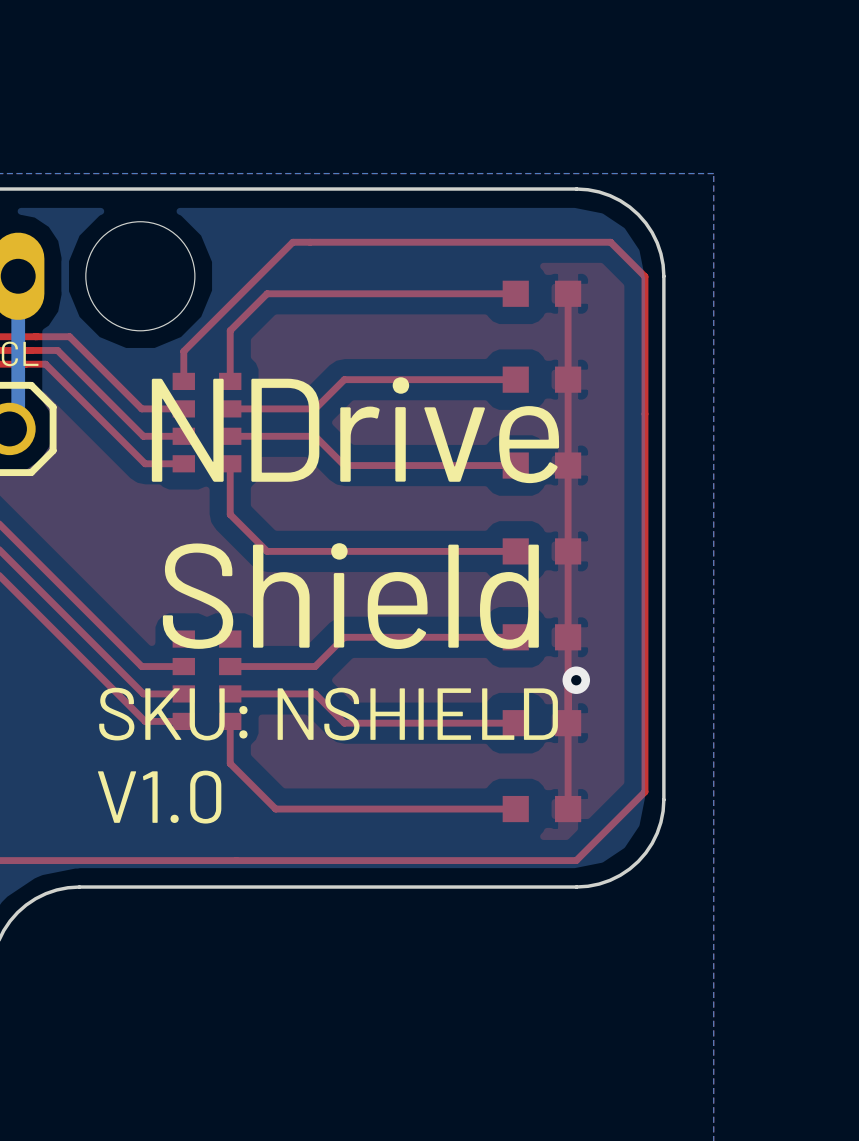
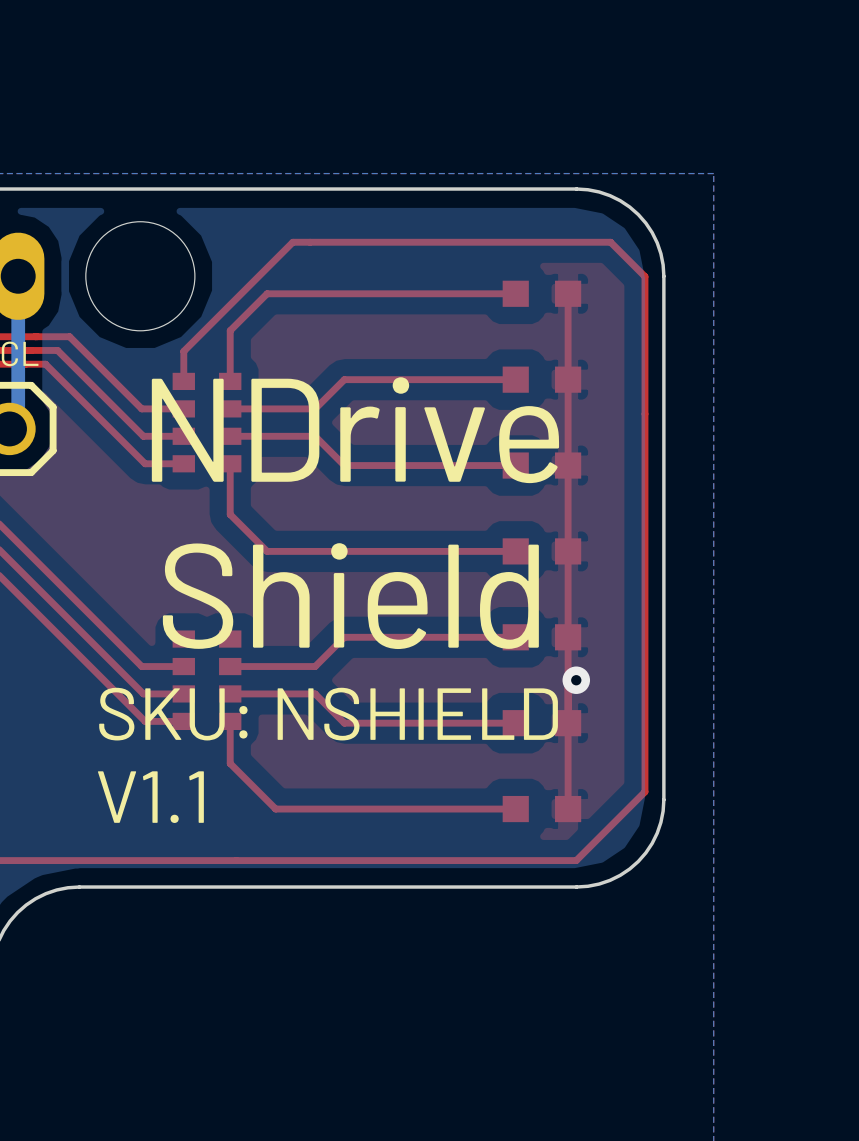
text: V1.0 (159, 797) -> V1.1 (150, 797)

